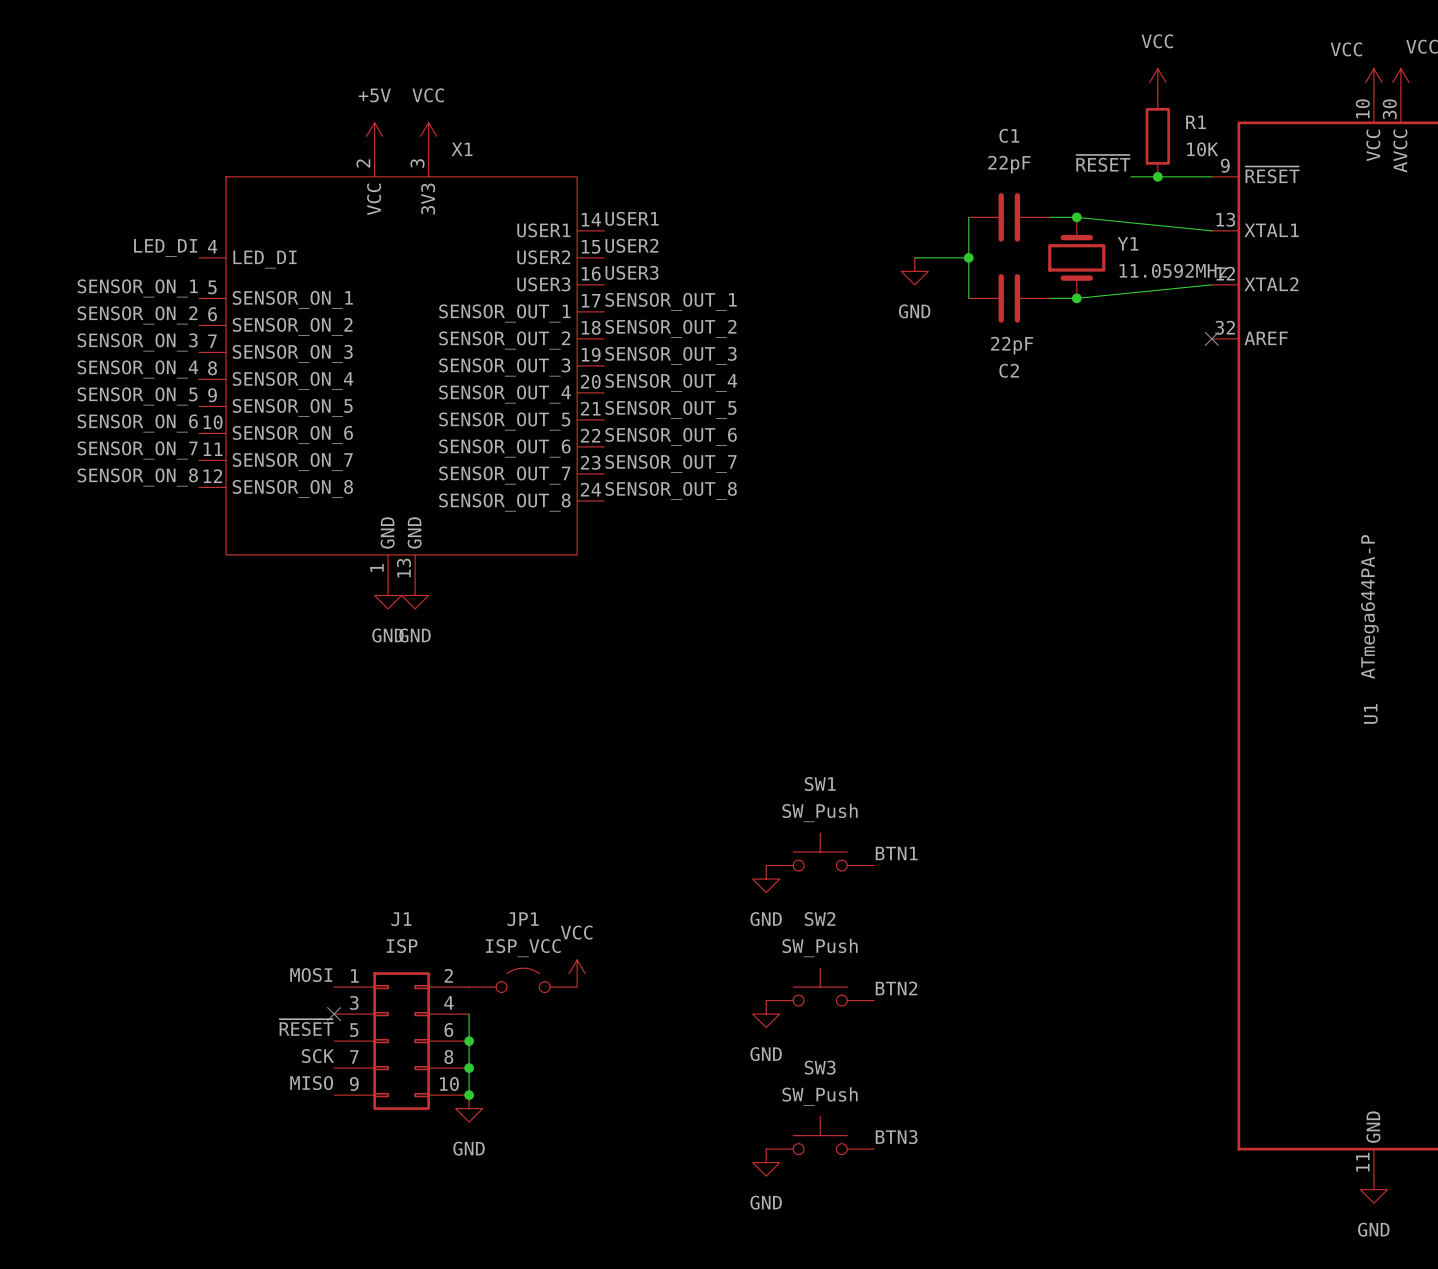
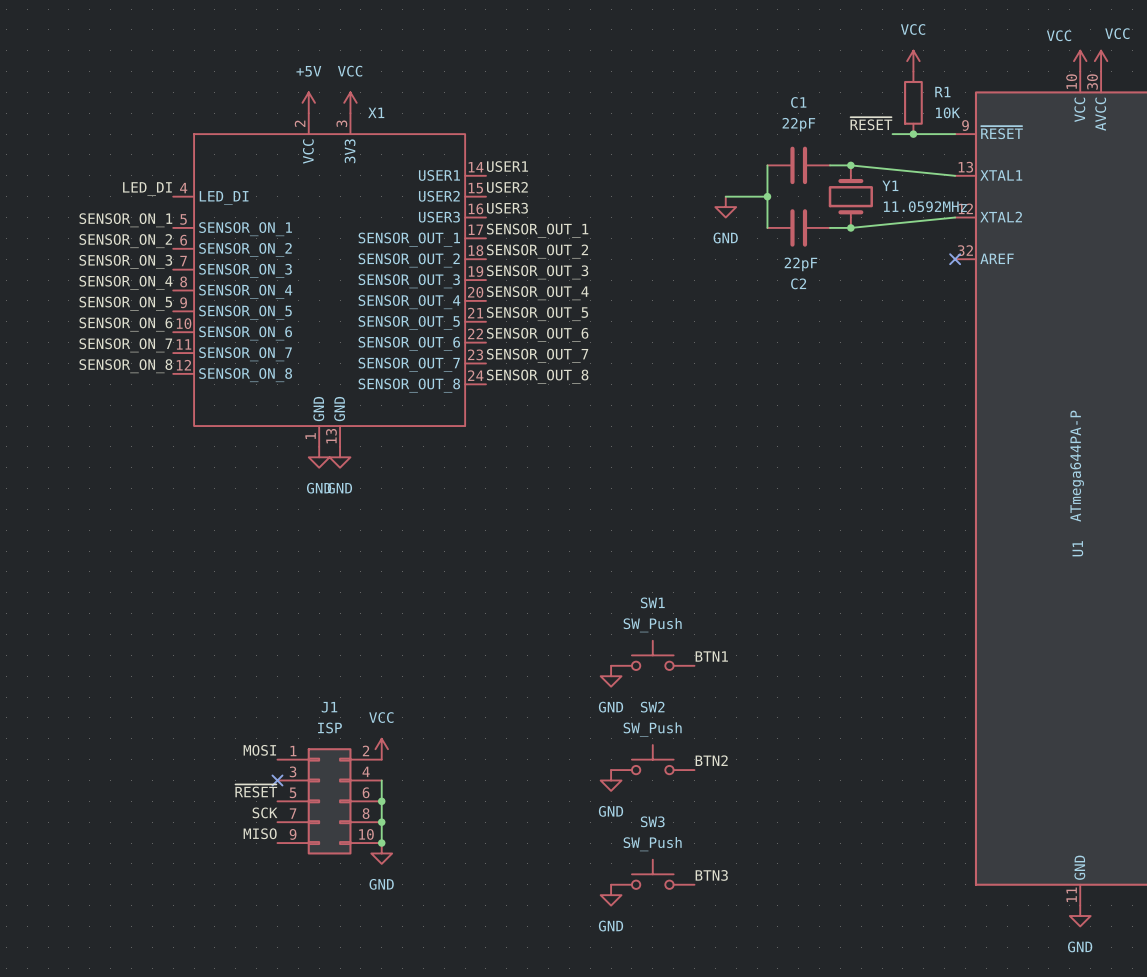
power symbol position: VCC (577, 973) -> VCC (381, 749)
JP1: ISP_VCC (523, 980) -> none

